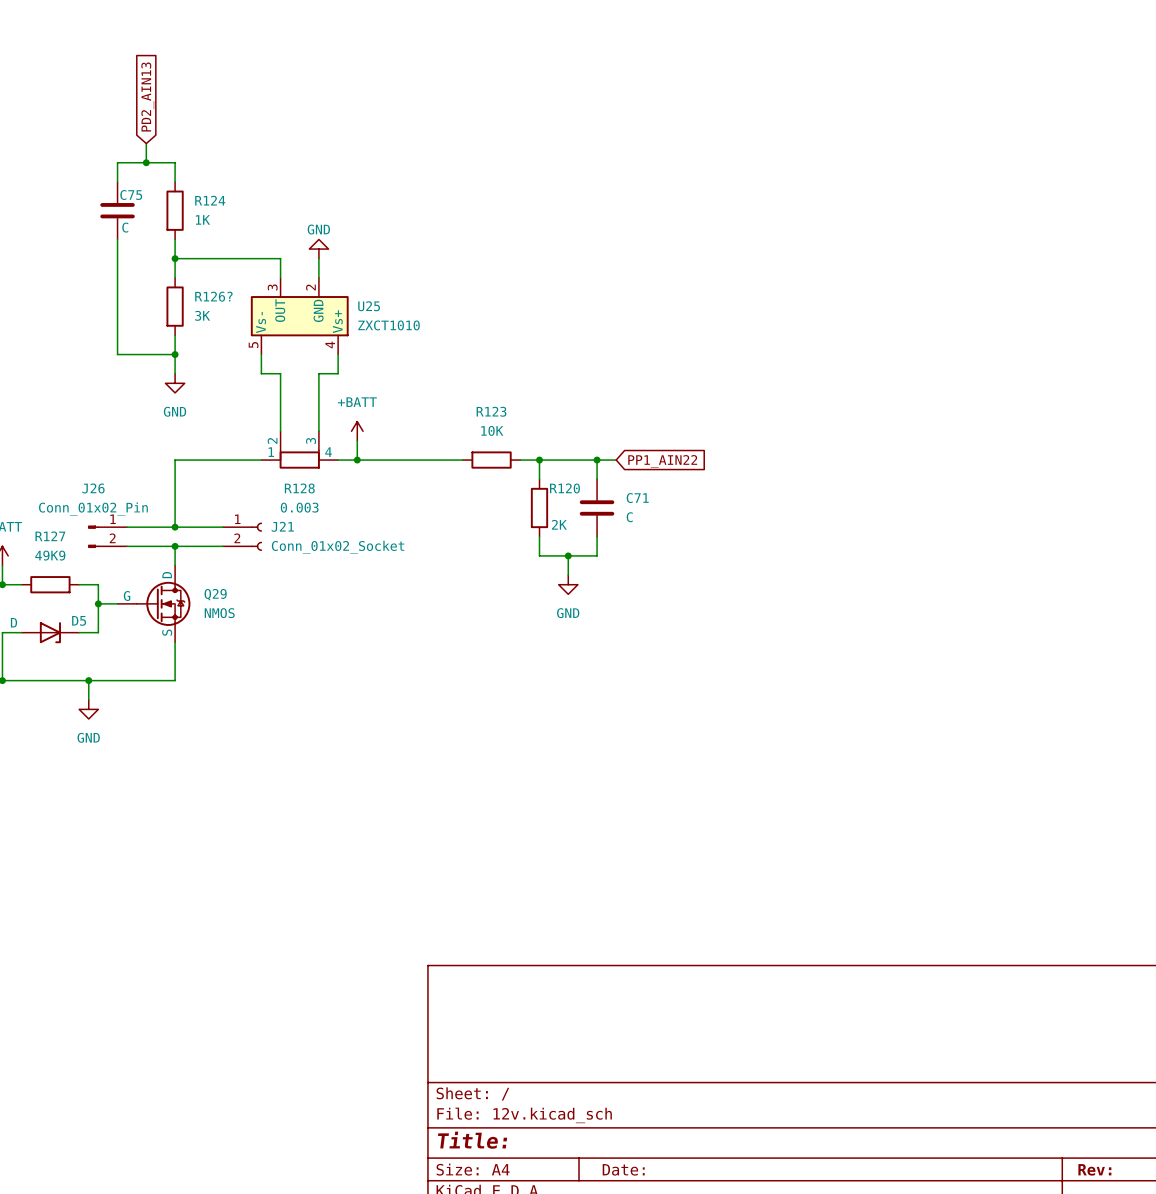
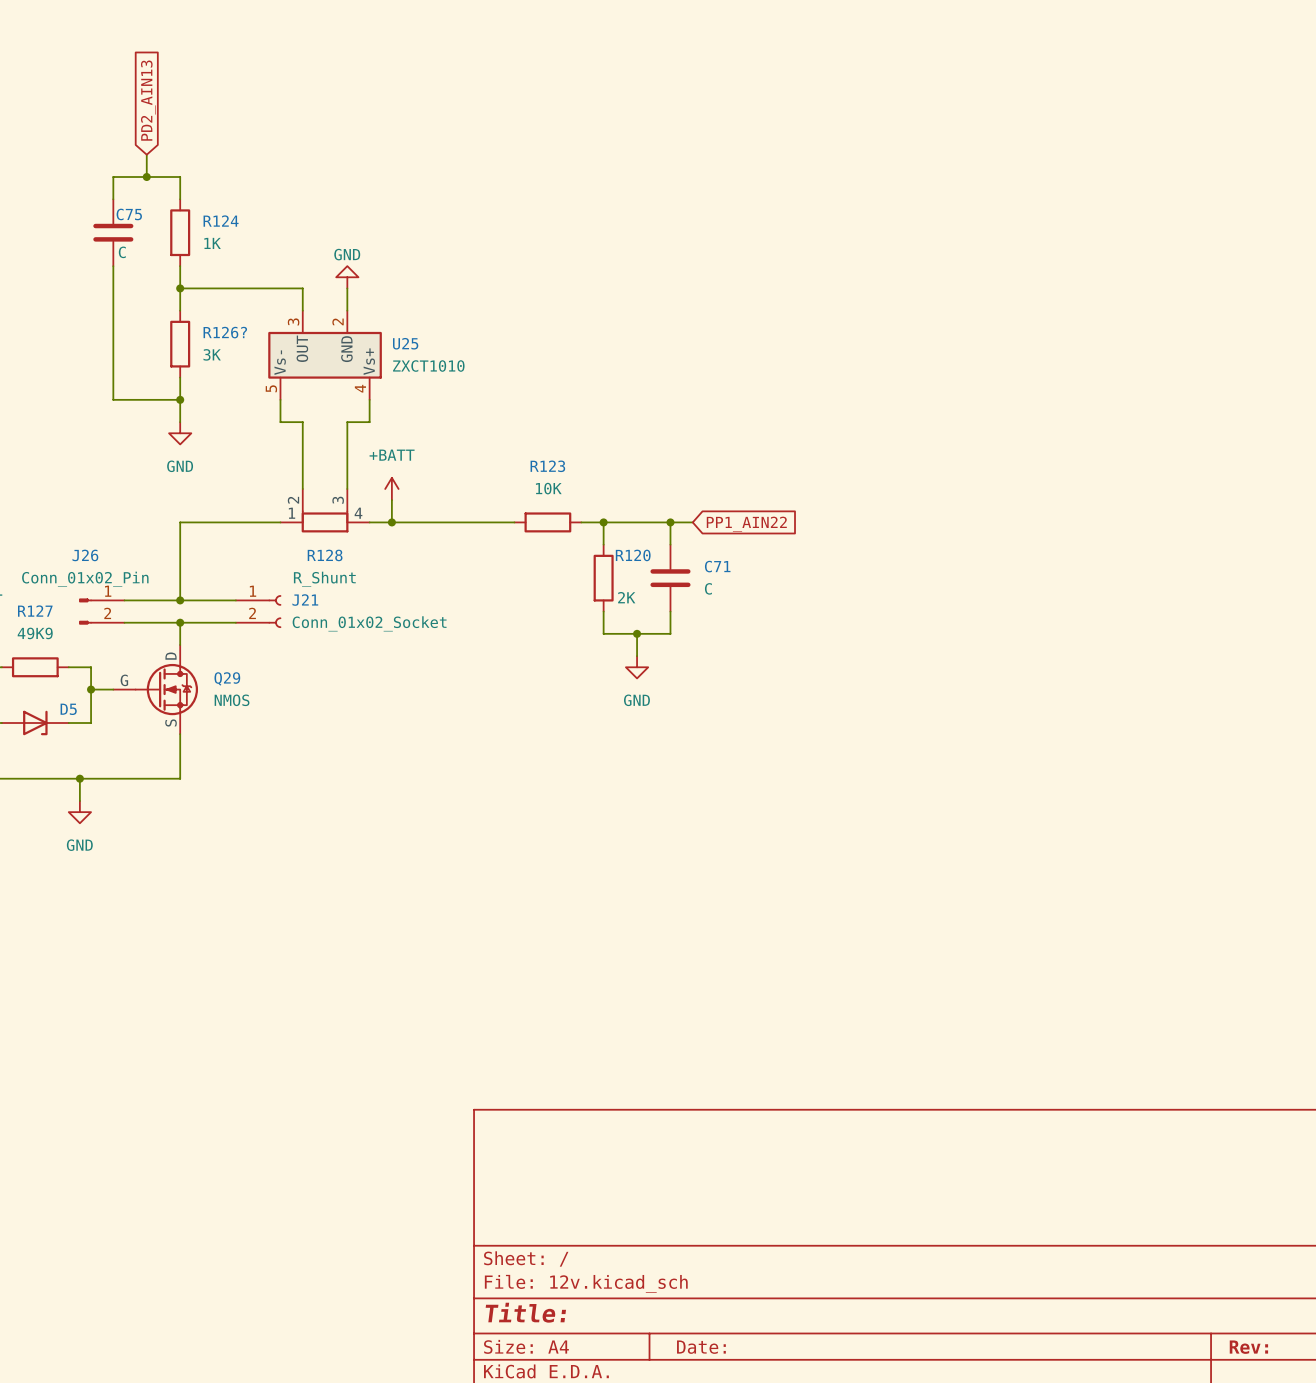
R128 value: 0.003 (299, 507) -> R_Shunt (324, 579)

